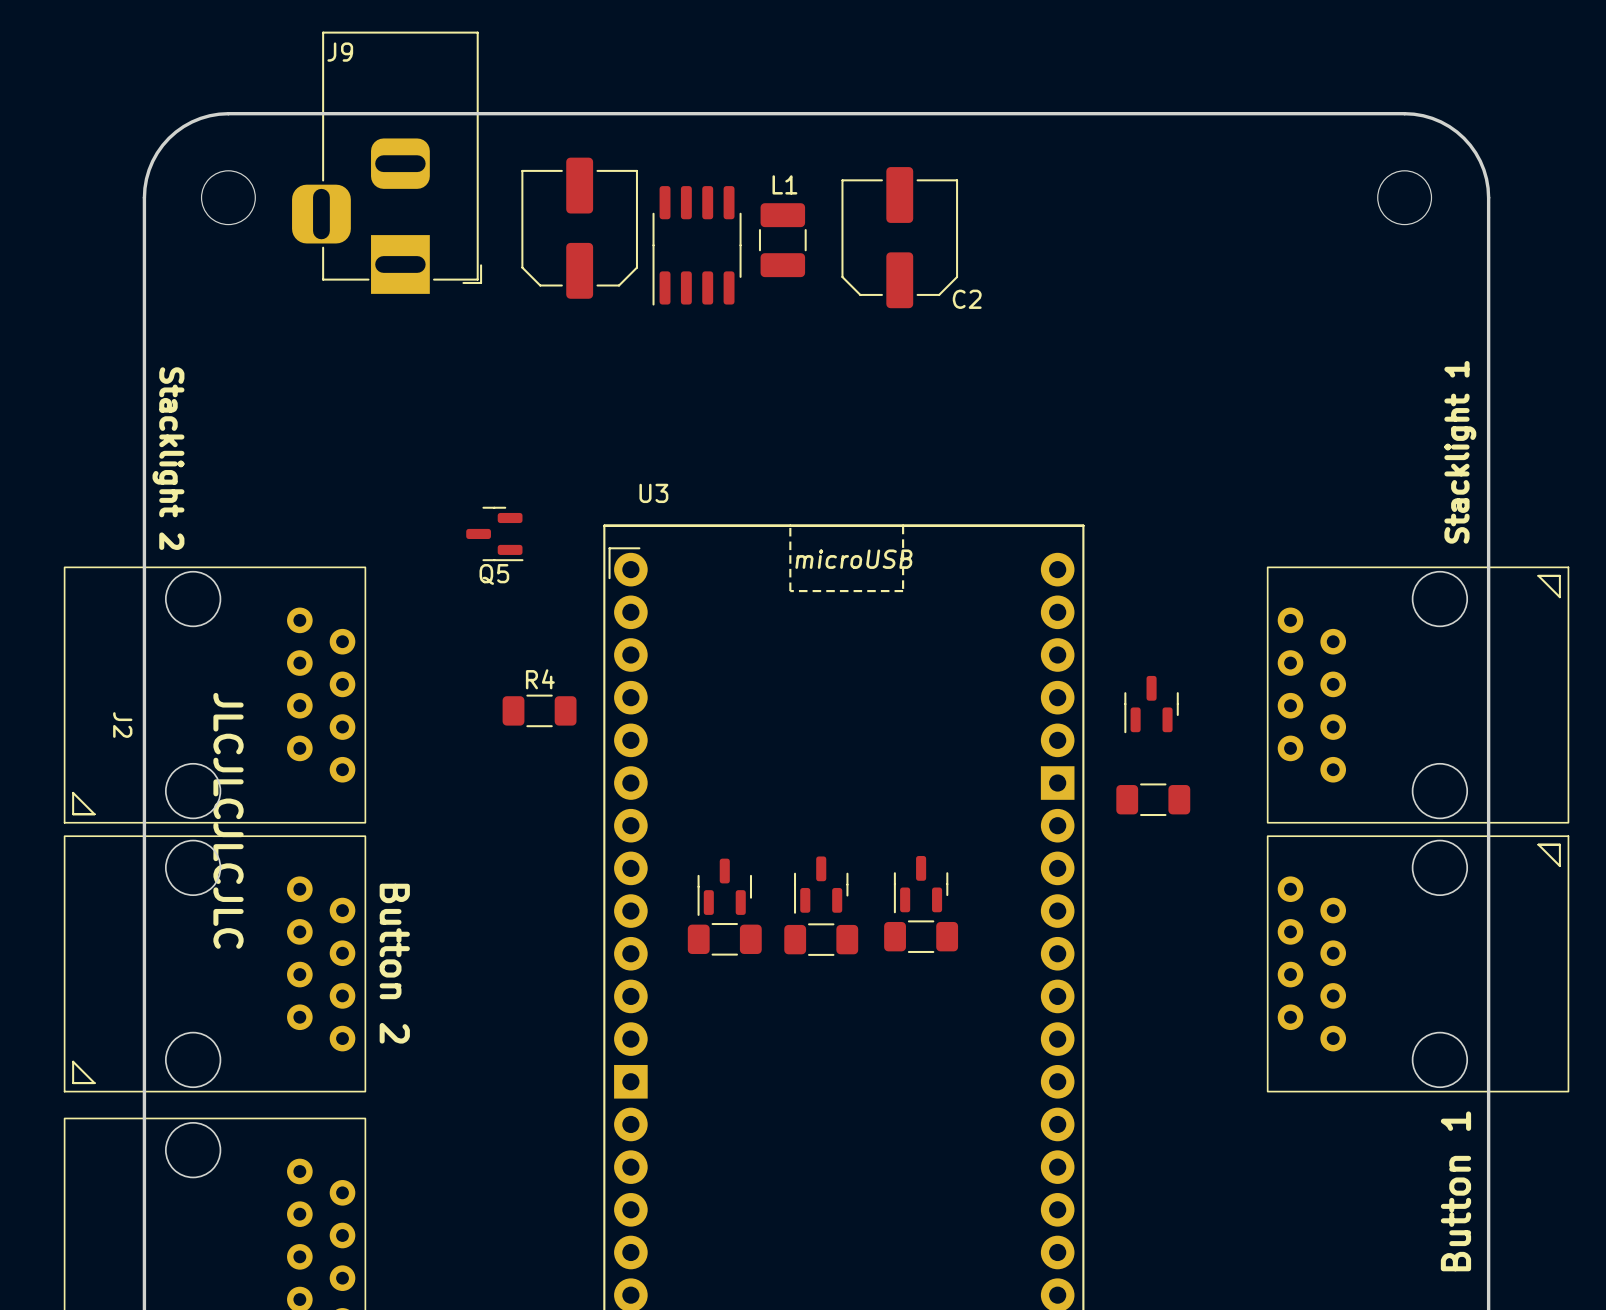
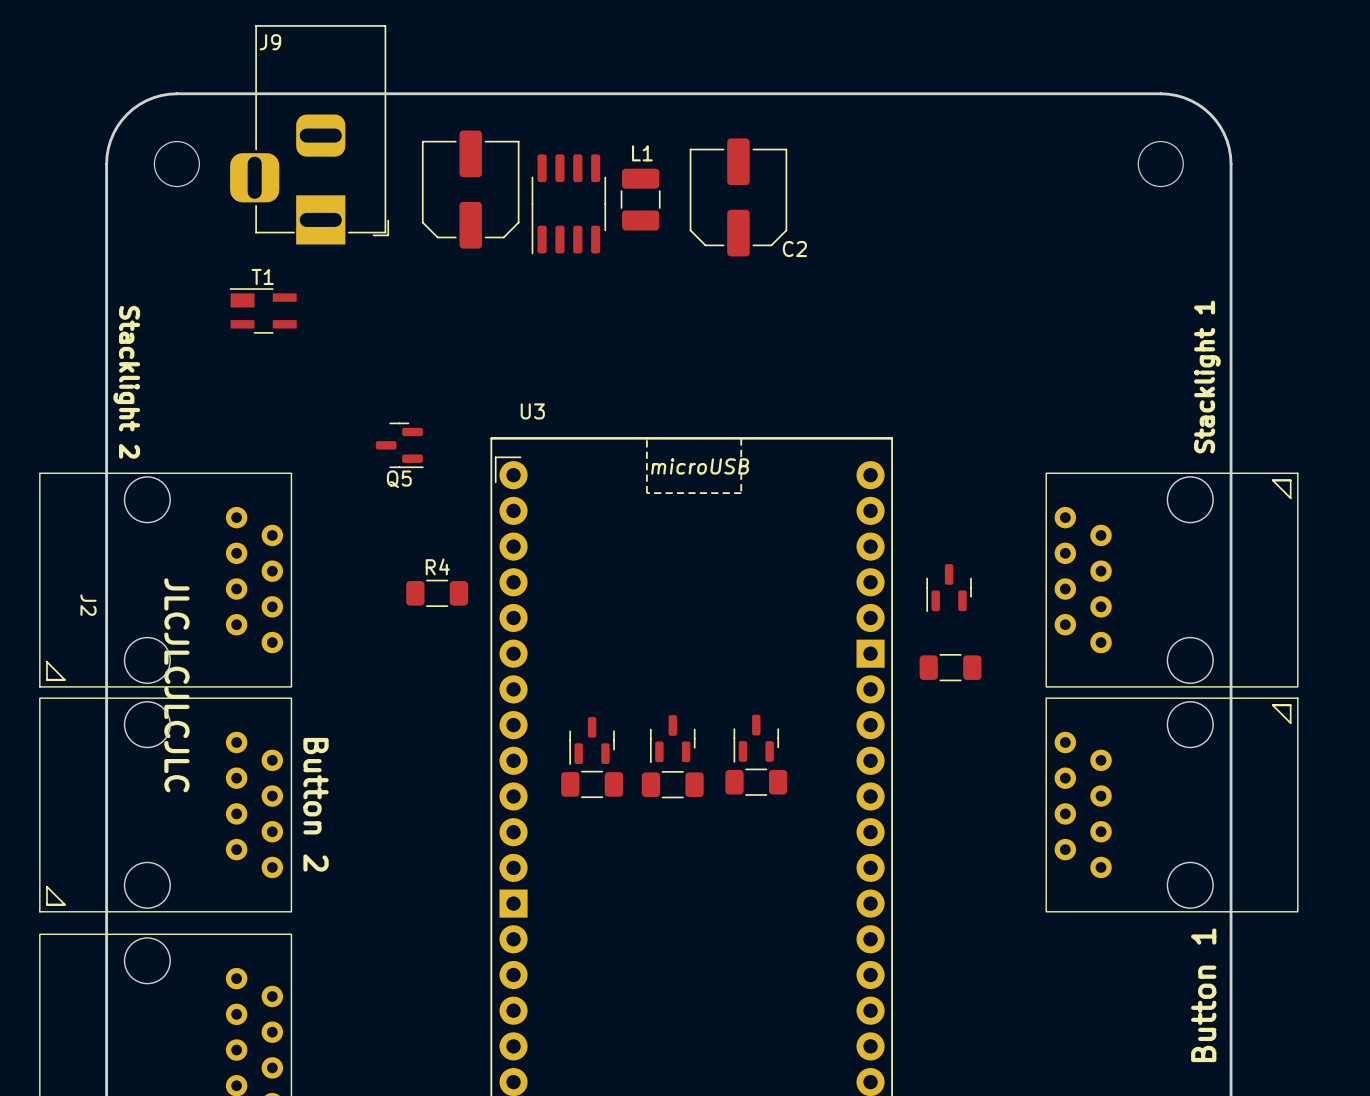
T1: none -> (263, 310)

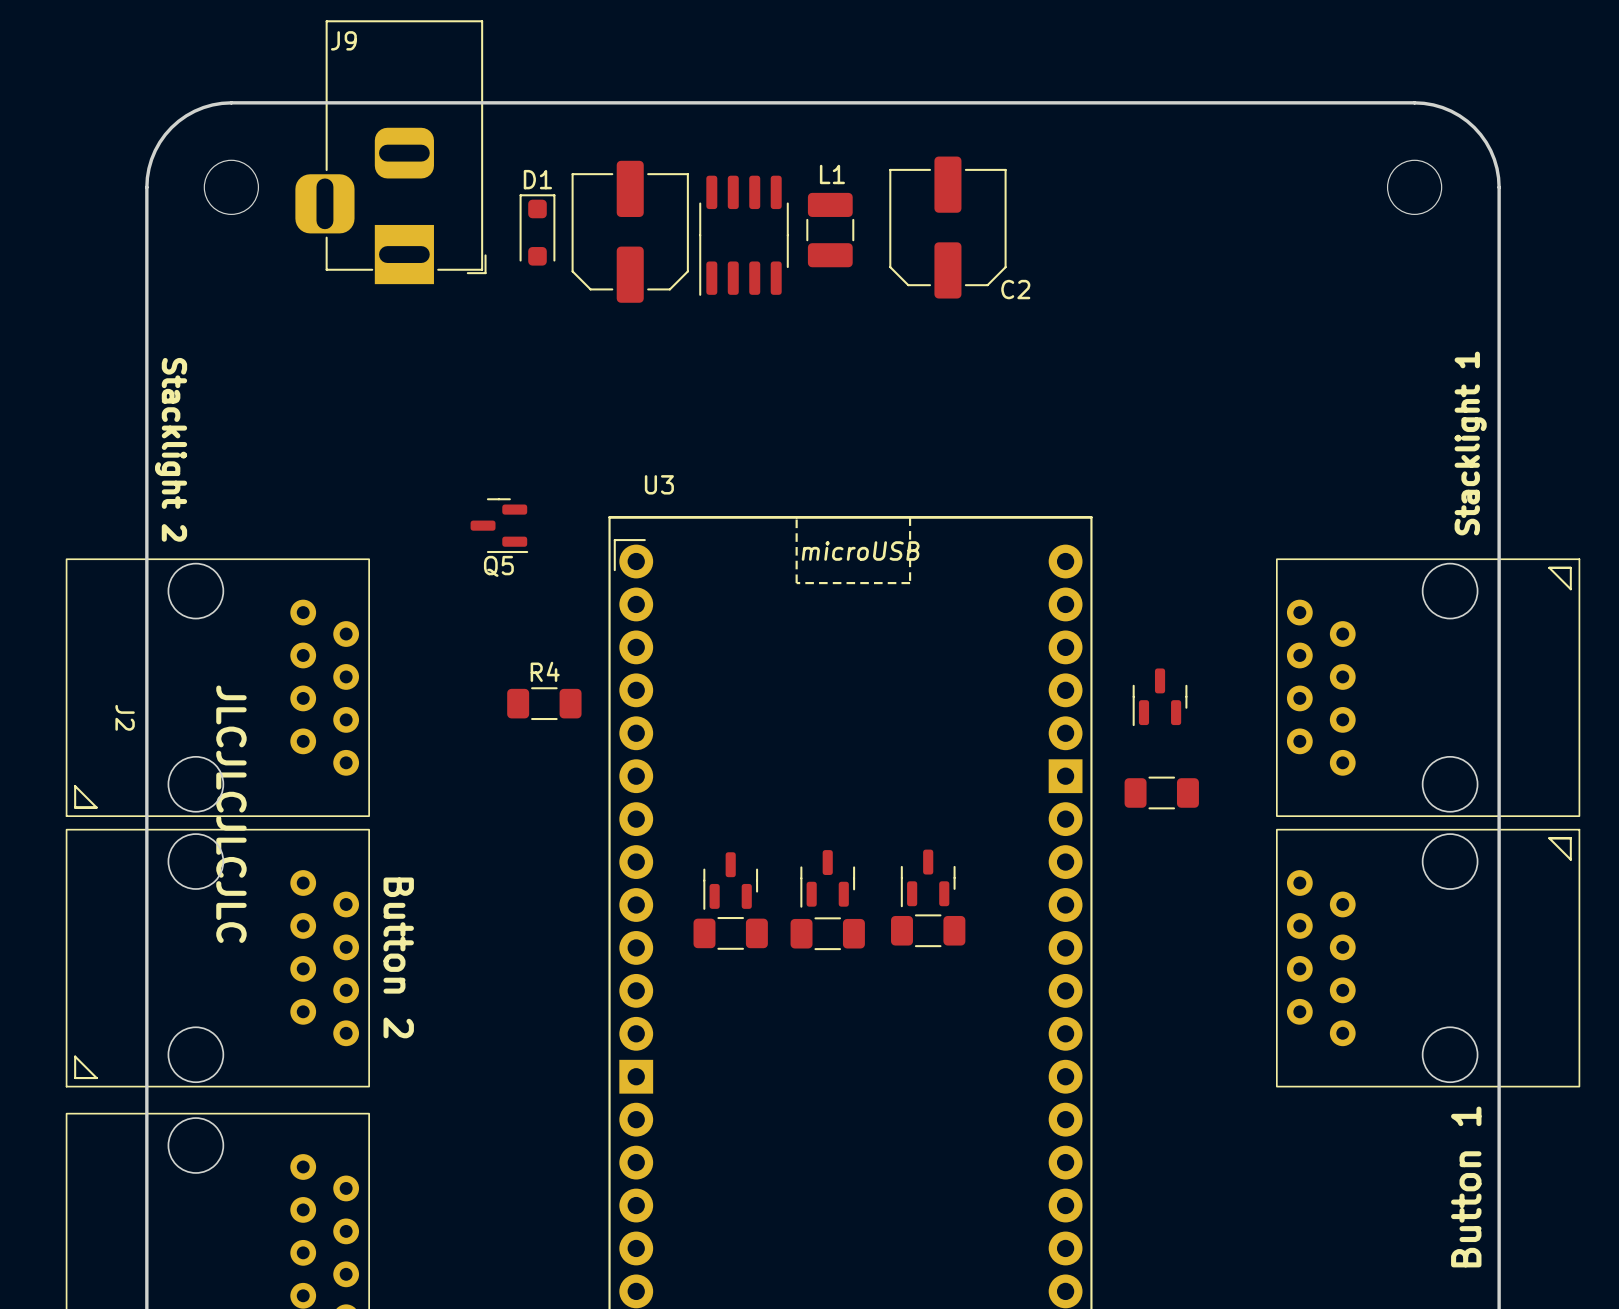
part position: (470, 189) -> (630, 231)
C2 position: (738, 197) -> (947, 227)
D1: none -> (537, 229)
L1 position: (640, 199) -> (830, 230)
part position: (568, 204) -> (744, 235)
T1: (263, 310) -> none

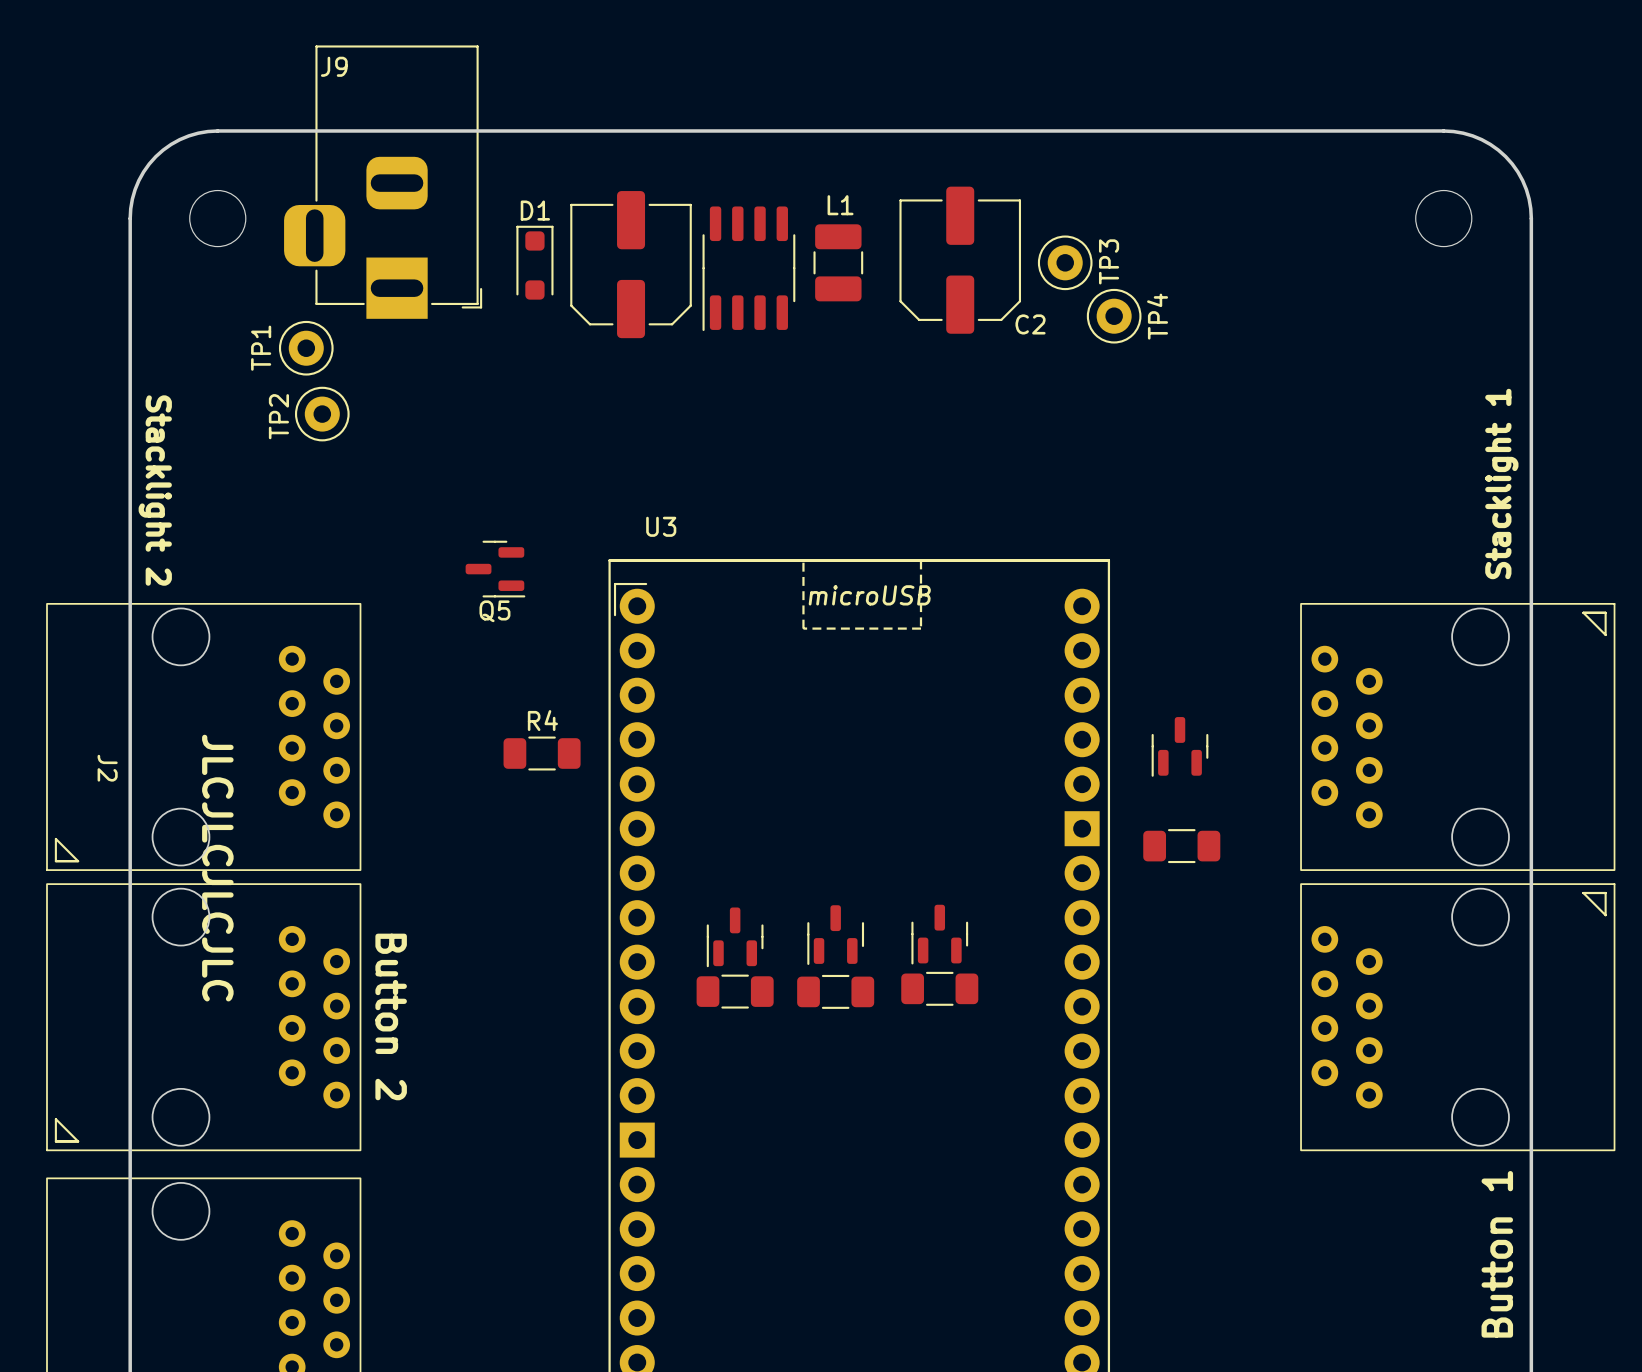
TP3: none -> (1065, 262)
TP4: none -> (1114, 316)
TP1: none -> (306, 348)
TP2: none -> (322, 414)

